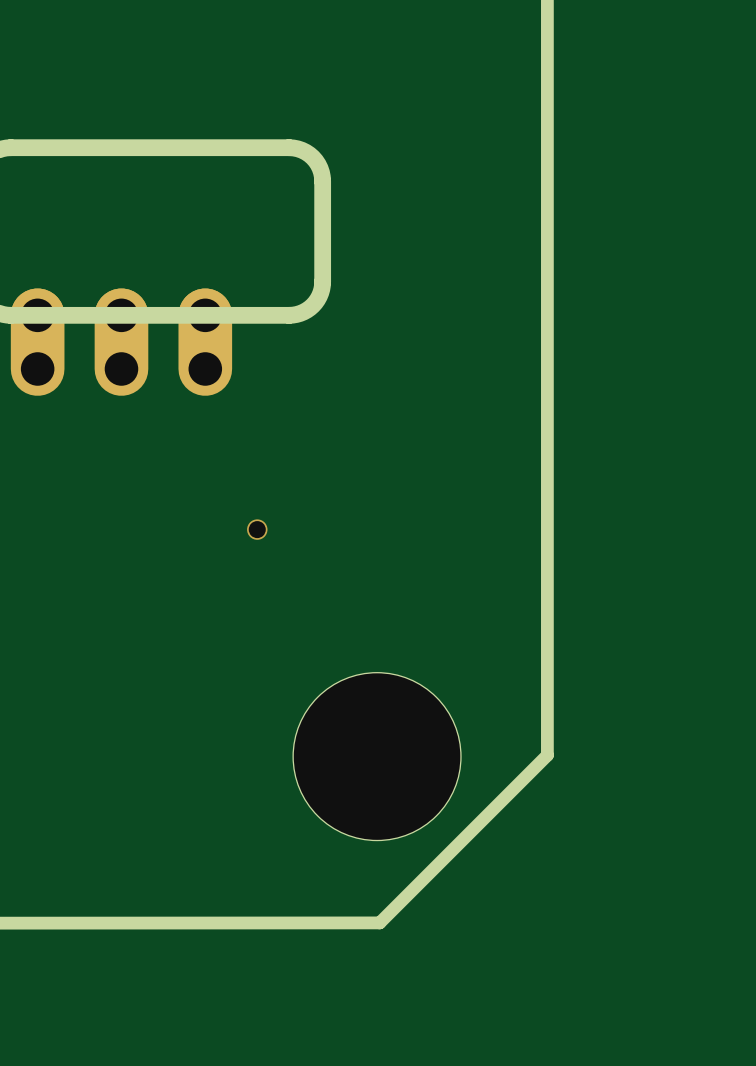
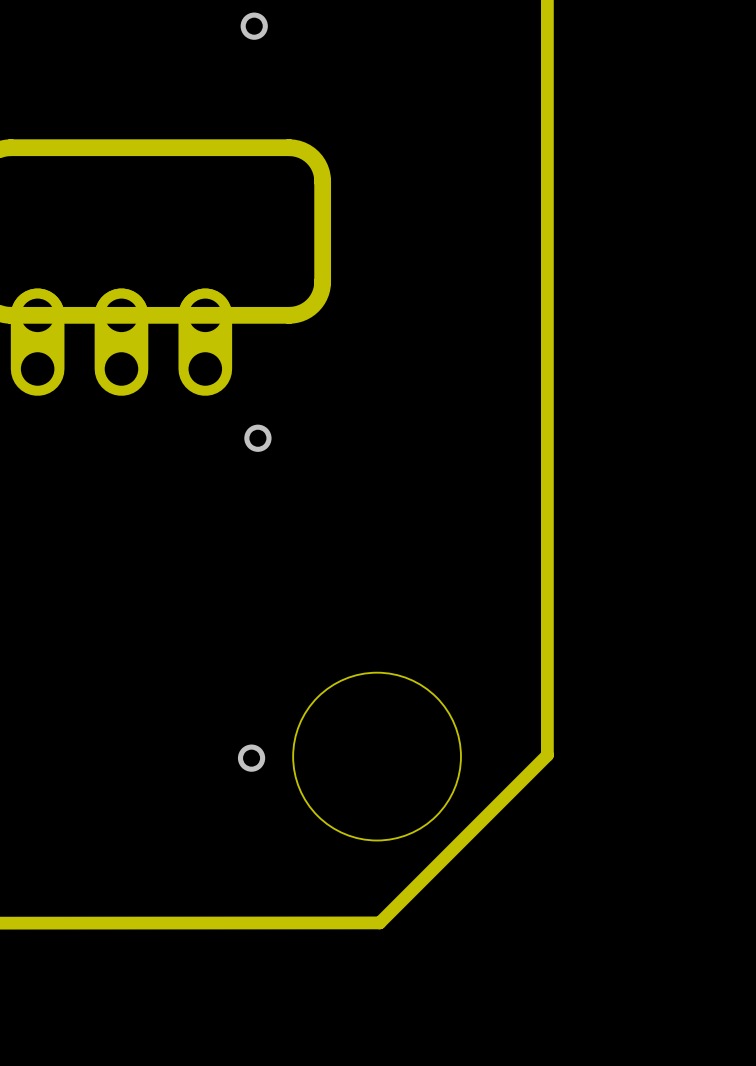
via: none -> (254, 26)
via: none -> (257, 438)
via: (257, 529) -> none
via: none -> (251, 758)

